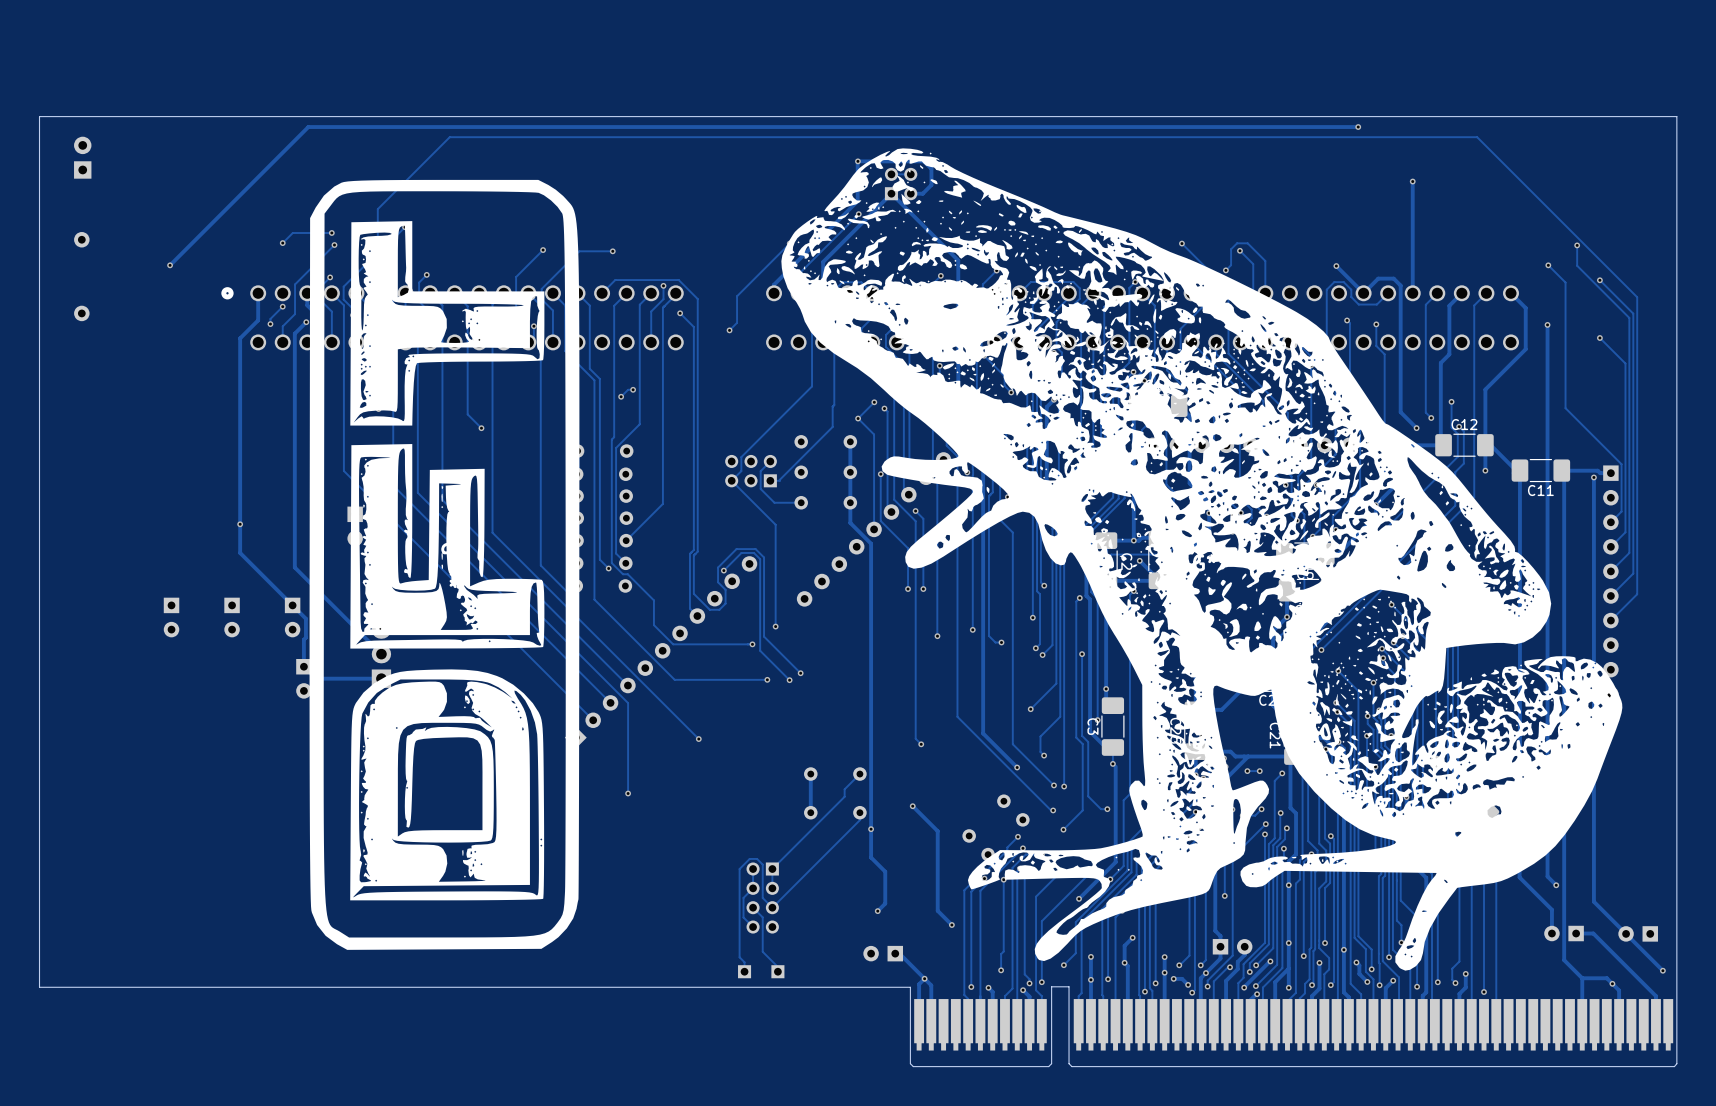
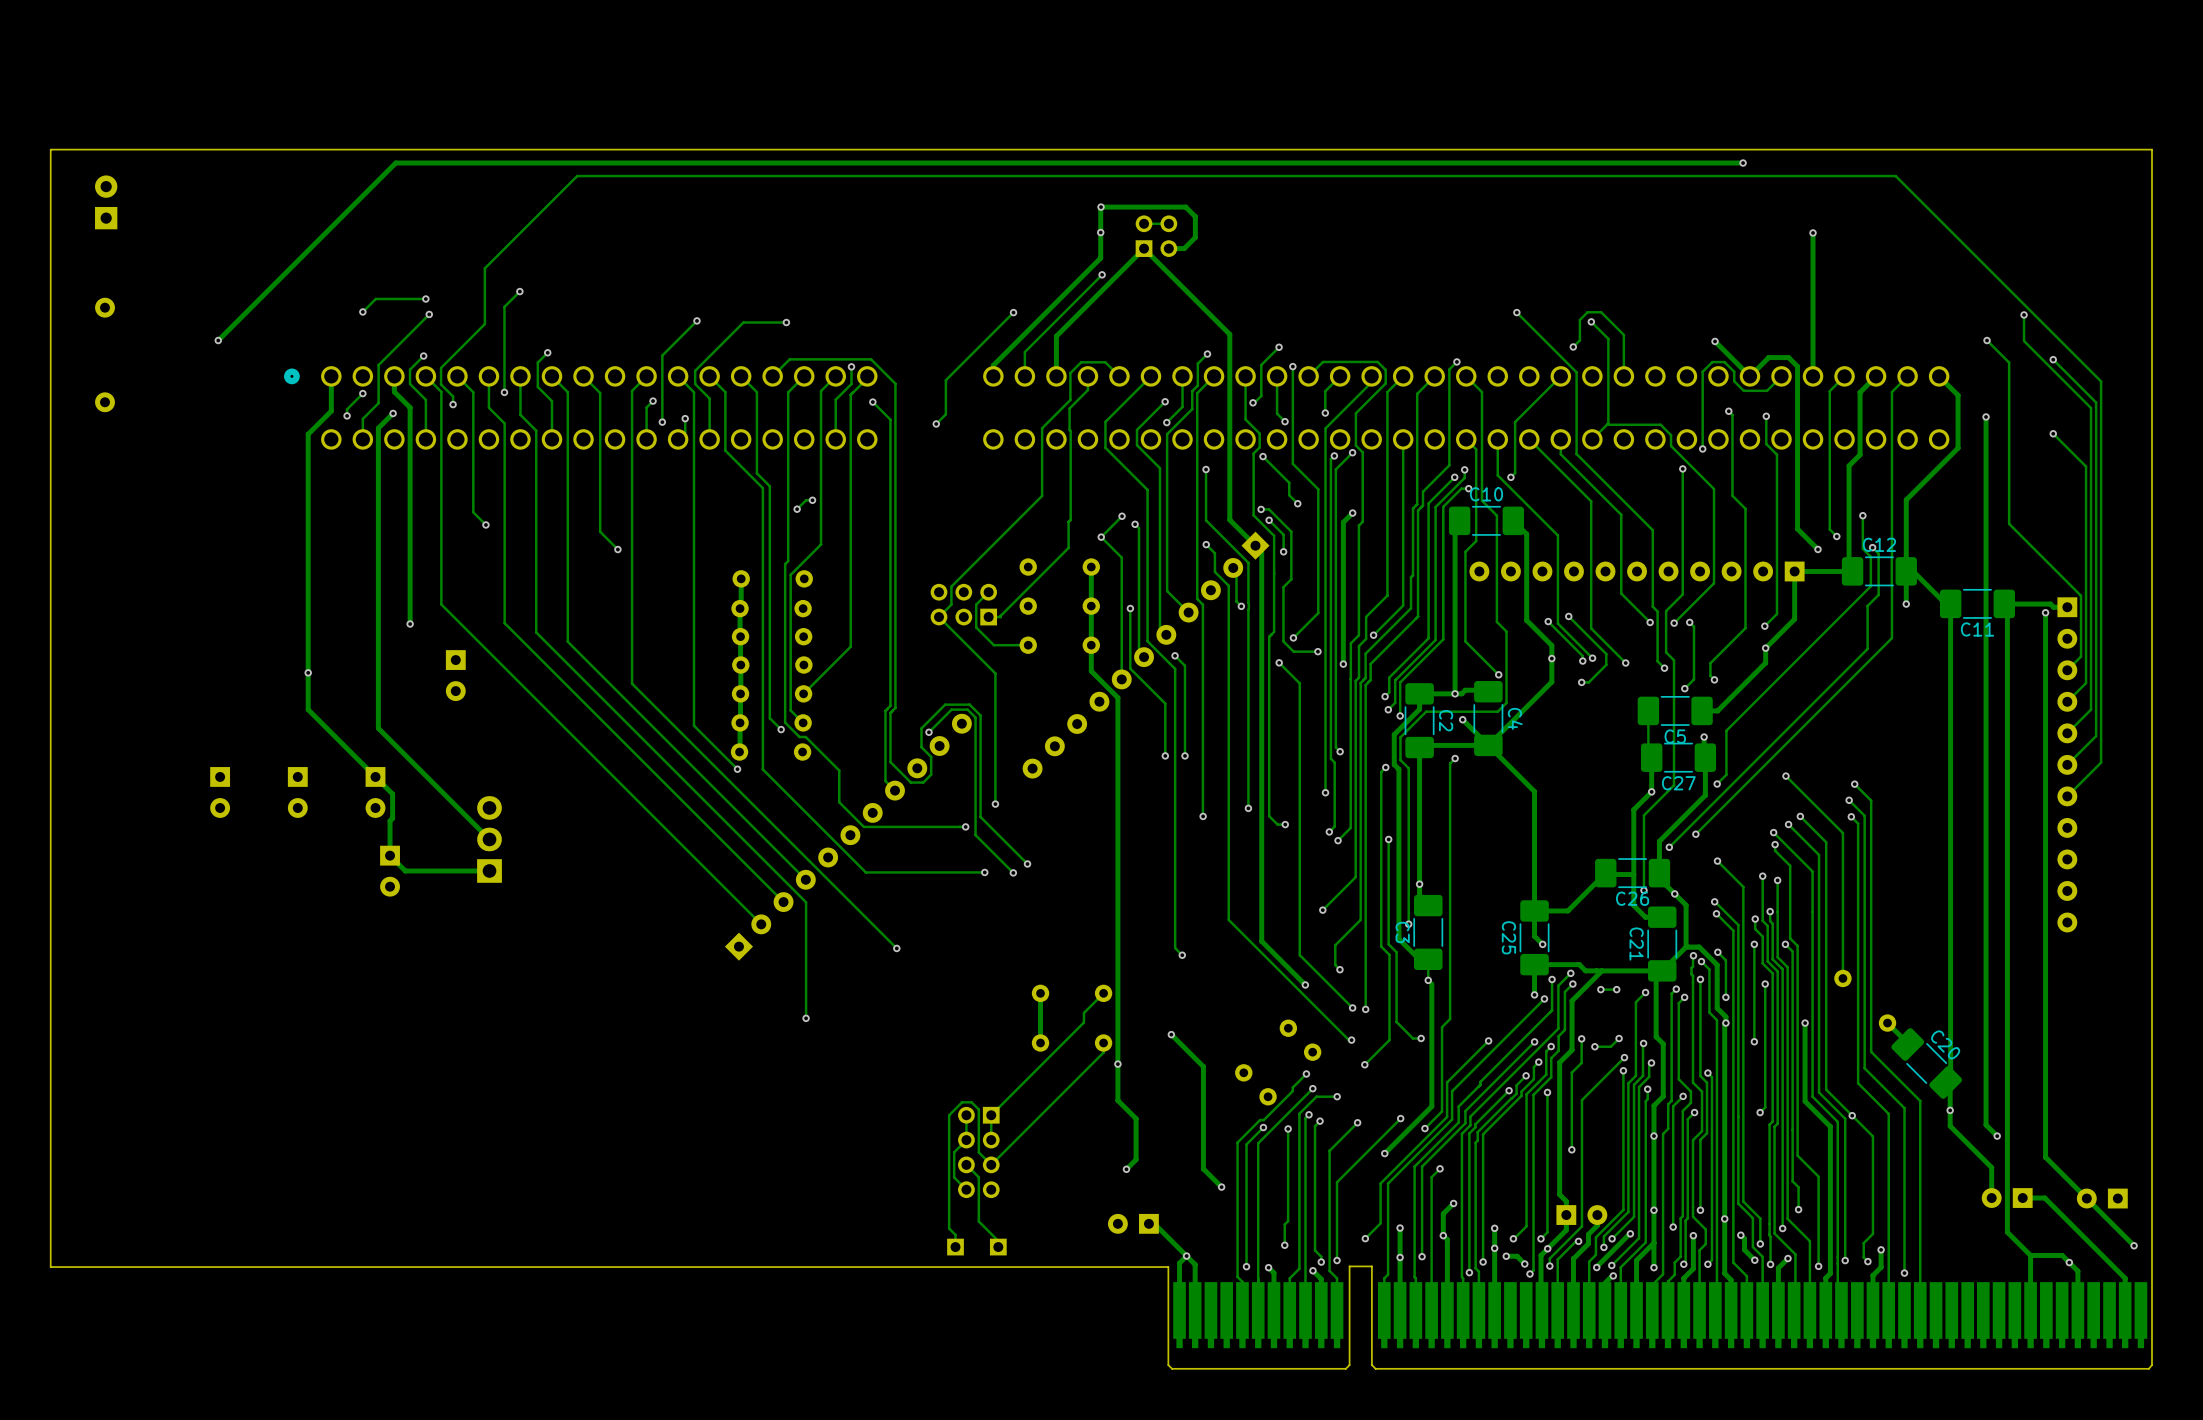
part: (1201, 559) -> none
part: (444, 564) -> none

